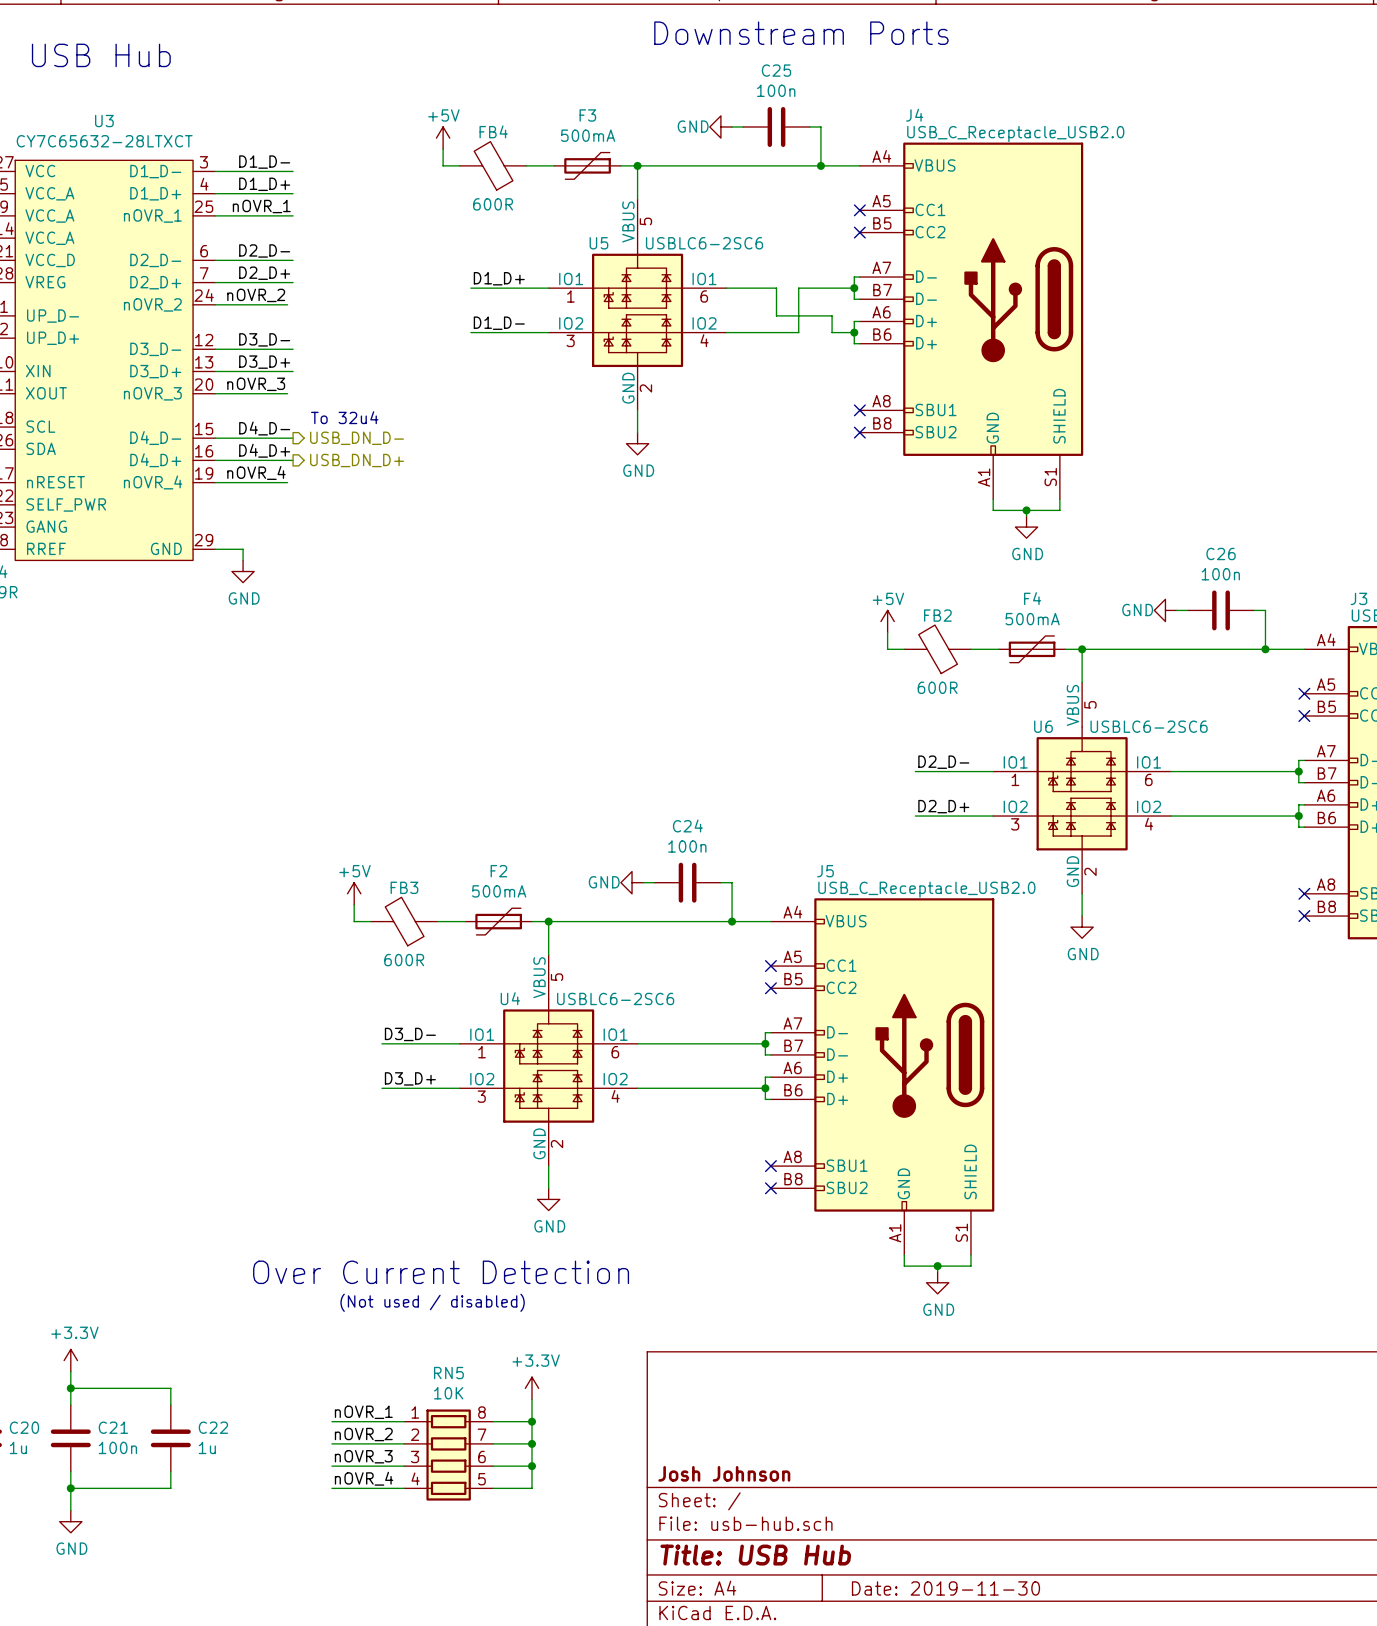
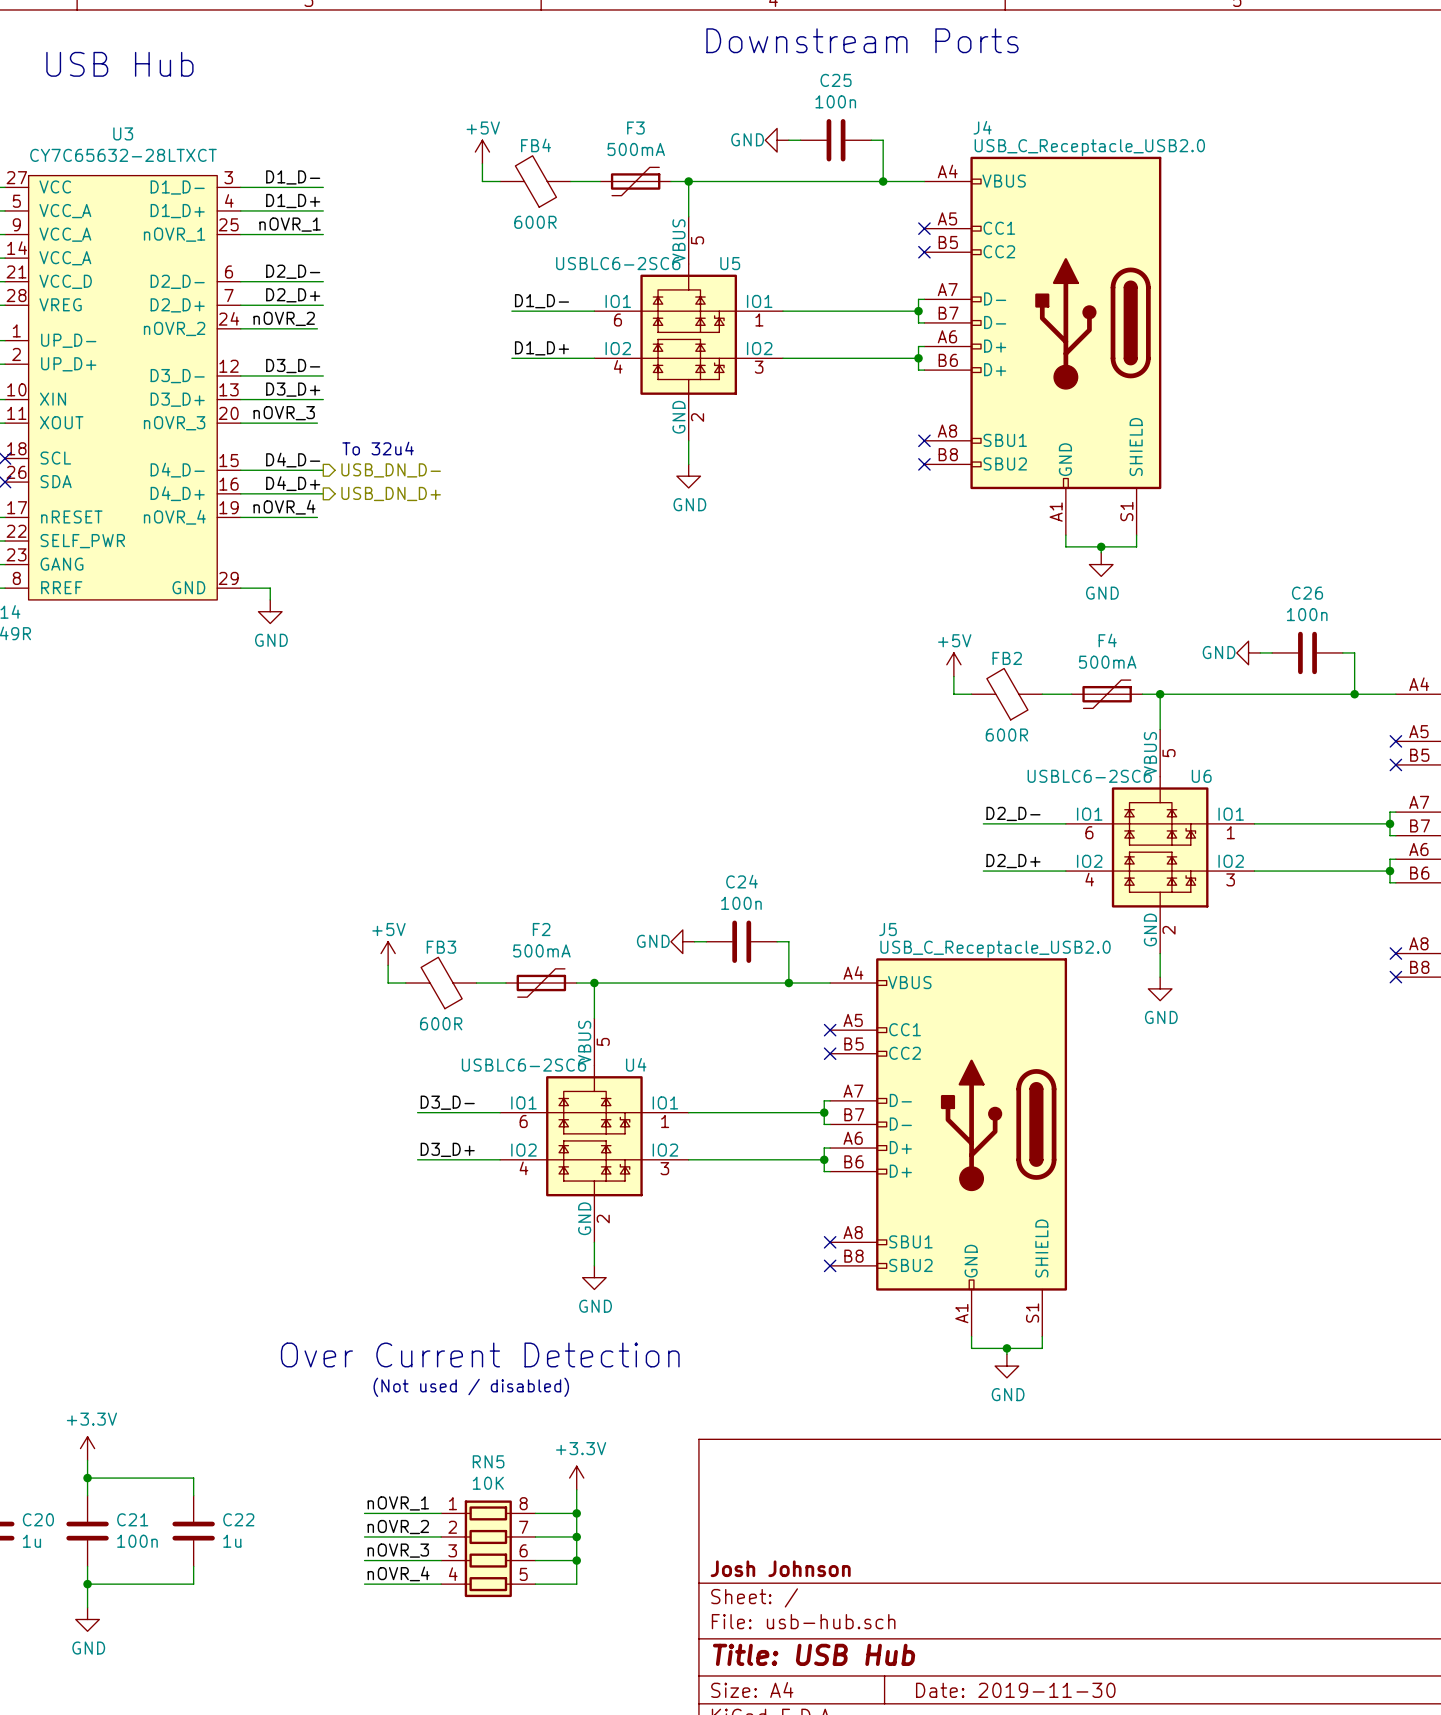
label: D1_D+ (499, 278) -> D1_D- (542, 301)
wire: (776, 288) (776, 315) (832, 315) (832, 332) -> (859, 358) (894, 358)
wire: (798, 288) (798, 332) -> (859, 311) (836, 311)
U5 flip: as is (637, 305) -> left-right (688, 329)
label: D1_D- (499, 323) -> D1_D+ (542, 348)
U6 flip: as is (1082, 788) -> left-right (1160, 842)
U4 flip: as is (548, 1061) -> left-right (594, 1130)

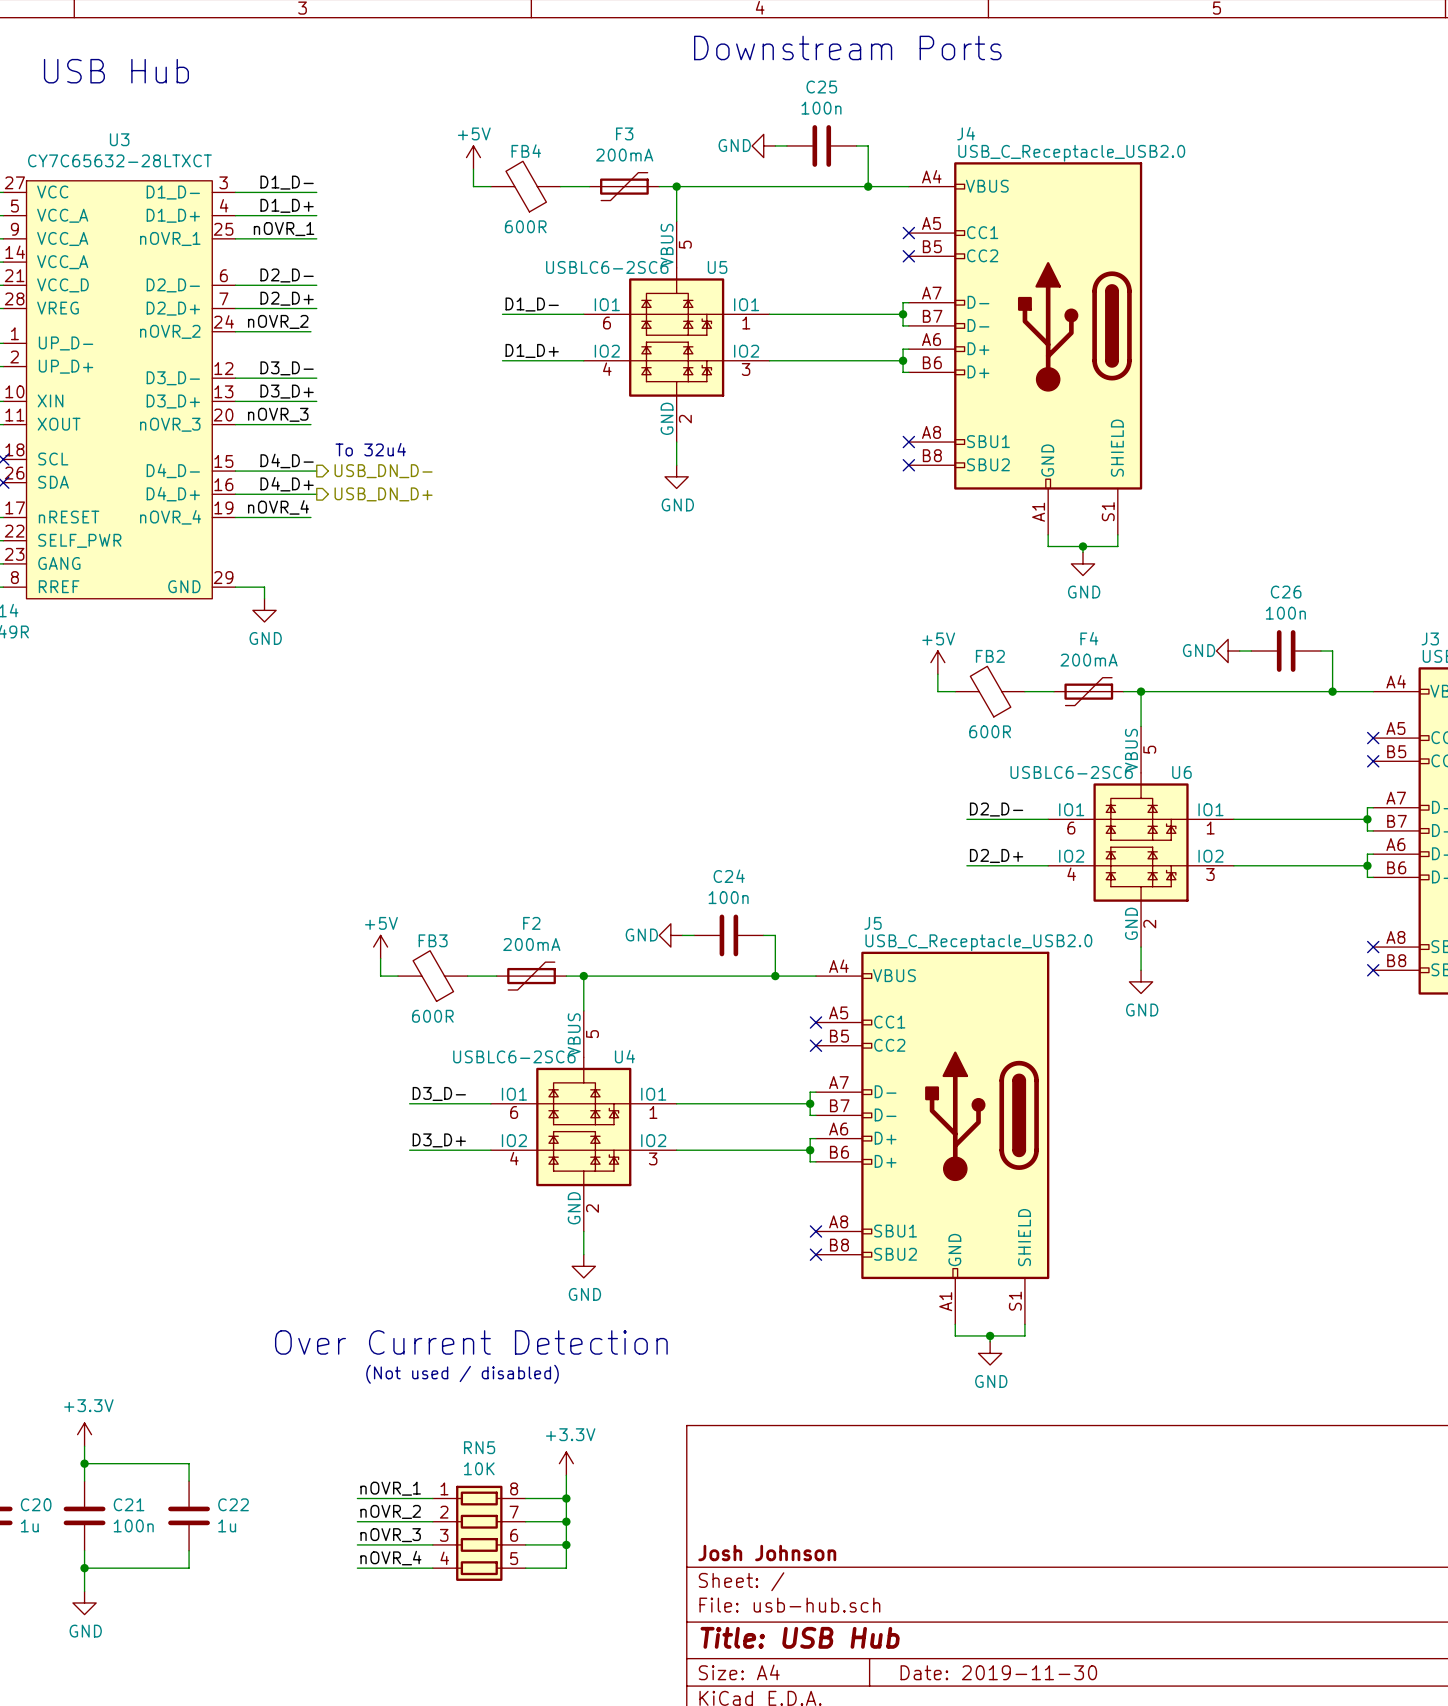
F3 value: 500mA (636, 149) -> 200mA (624, 155)
F4 value: 500mA (1107, 662) -> 200mA (1089, 660)
F2 value: 500mA (541, 950) -> 200mA (531, 944)

